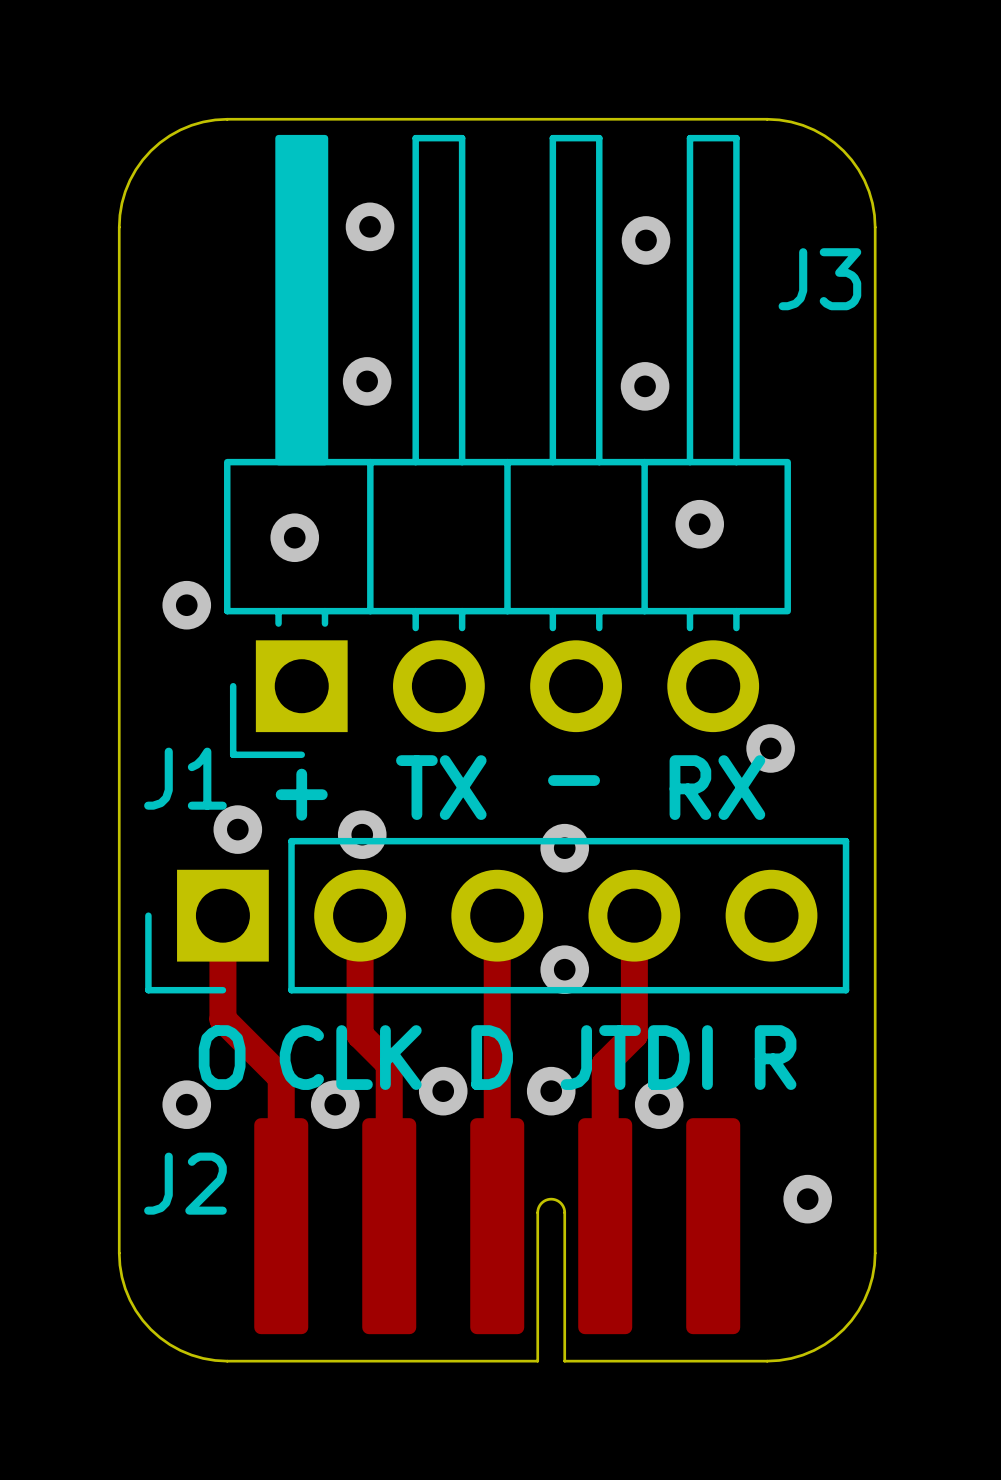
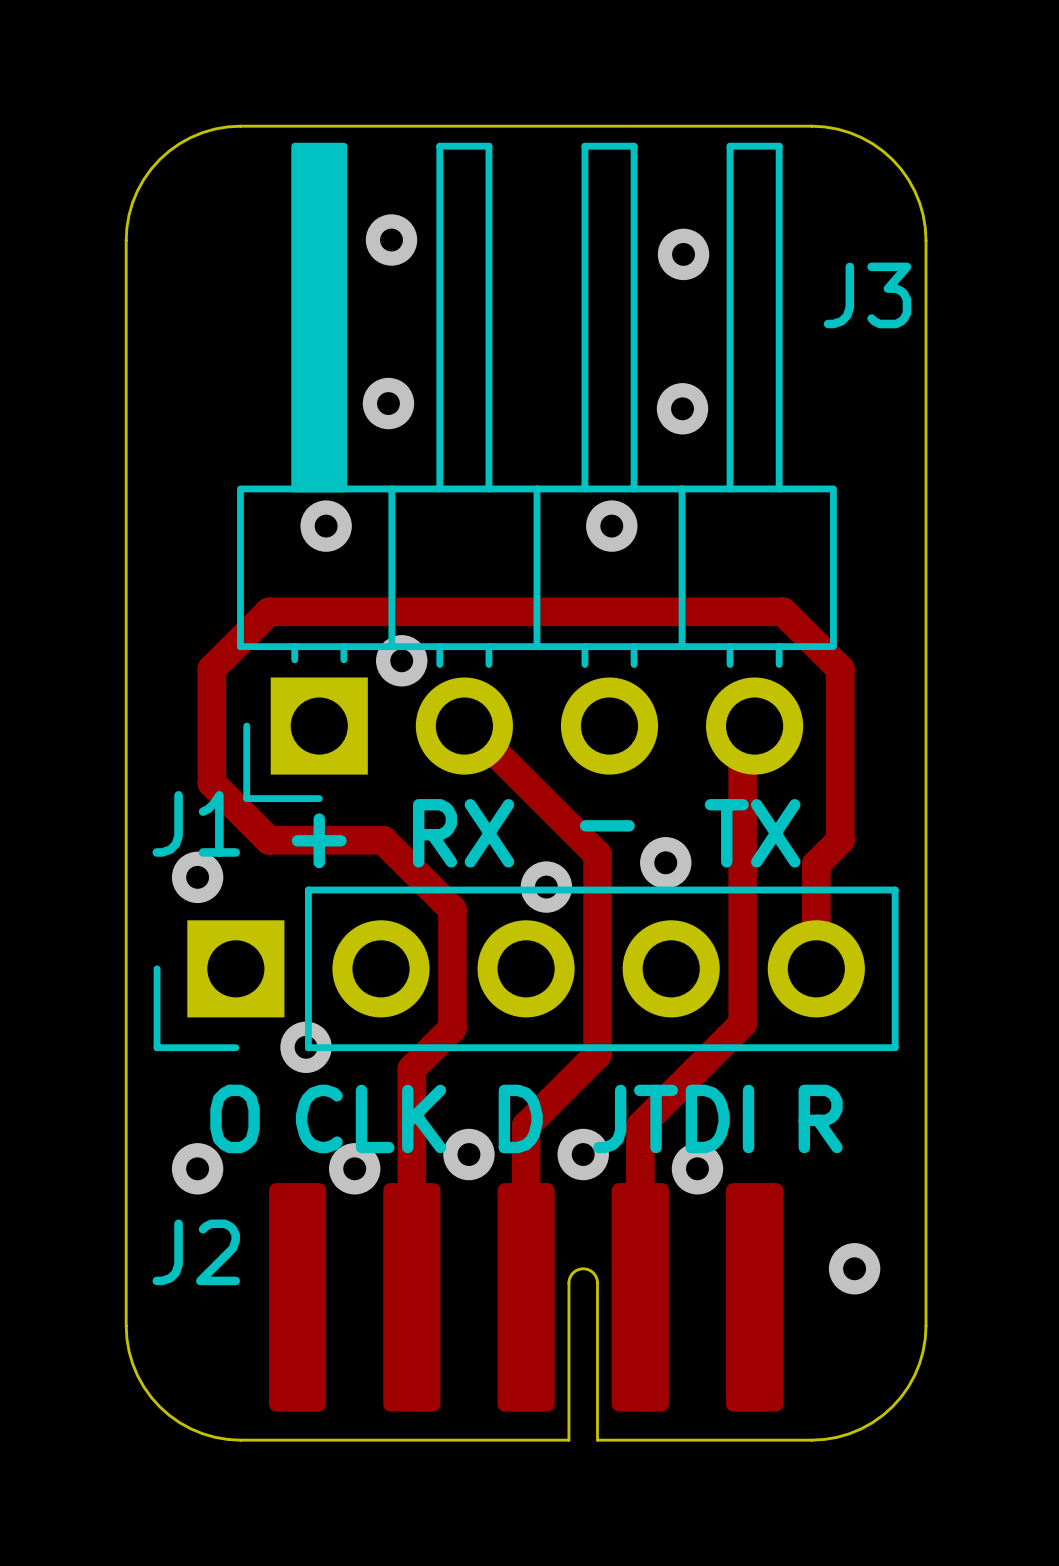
via position: (699, 524) -> (611, 526)
via position: (294, 537) -> (326, 526)
via: (186, 605) -> none
via: none -> (401, 660)
via: (770, 748) -> none
text: TX (441, 787) -> RX (463, 833)
text: RX (717, 787) -> TX (752, 833)
via: none -> (665, 862)
via position: (237, 829) -> (197, 877)
via: (362, 834) -> none
via position: (564, 848) -> (546, 887)
track: (222, 915) (222, 1019) (281, 1077) (281, 1226) -> none
track: (360, 915) (360, 1035) (389, 1064) -> (816, 968) (816, 864) (840, 840) (840, 668) (783, 611) (269, 611) (211, 668) (211, 783) (269, 840) (383, 840) (452, 909) (452, 1028) (411, 1068) (411, 1125)
track: (497, 915) (497, 1064) -> (464, 726) (468, 726) (597, 854) (597, 1054) (526, 1125)
track: (634, 915) (634, 1035) -> (754, 726) (742, 738) (742, 1023) (671, 1095)
via: (564, 969) -> none
via: none -> (306, 1047)

